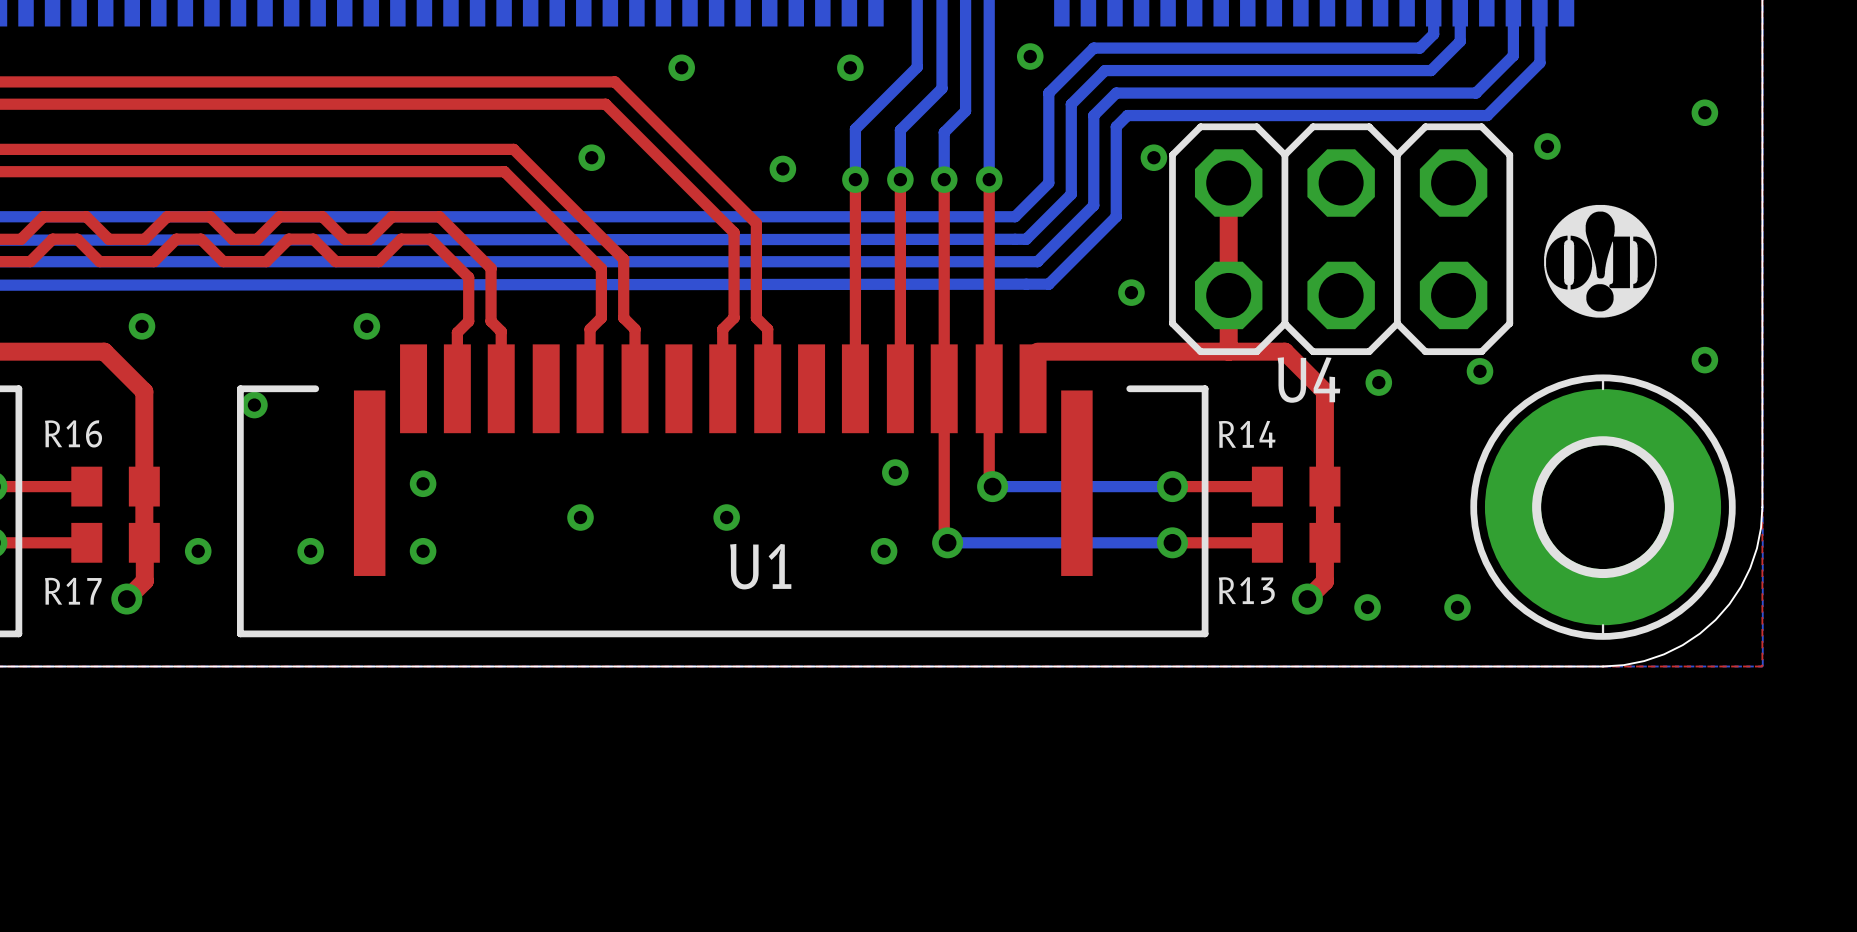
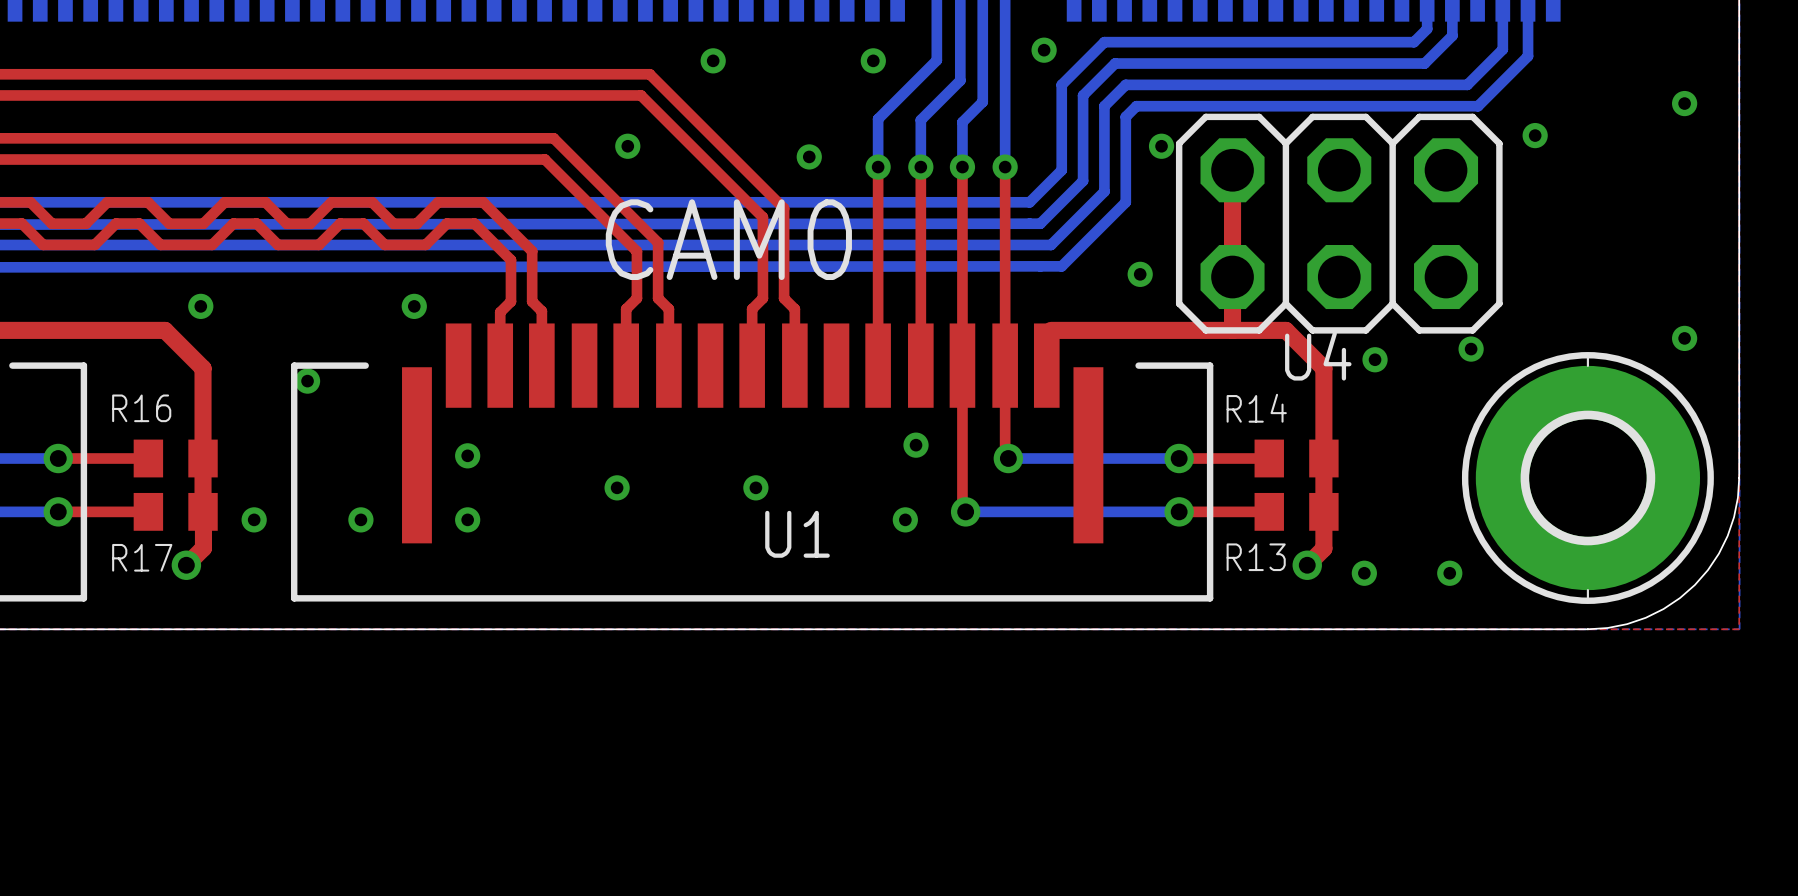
drawing: [1544, 204, 1657, 318] -> none
text: none -> CAM0 (728, 239)

